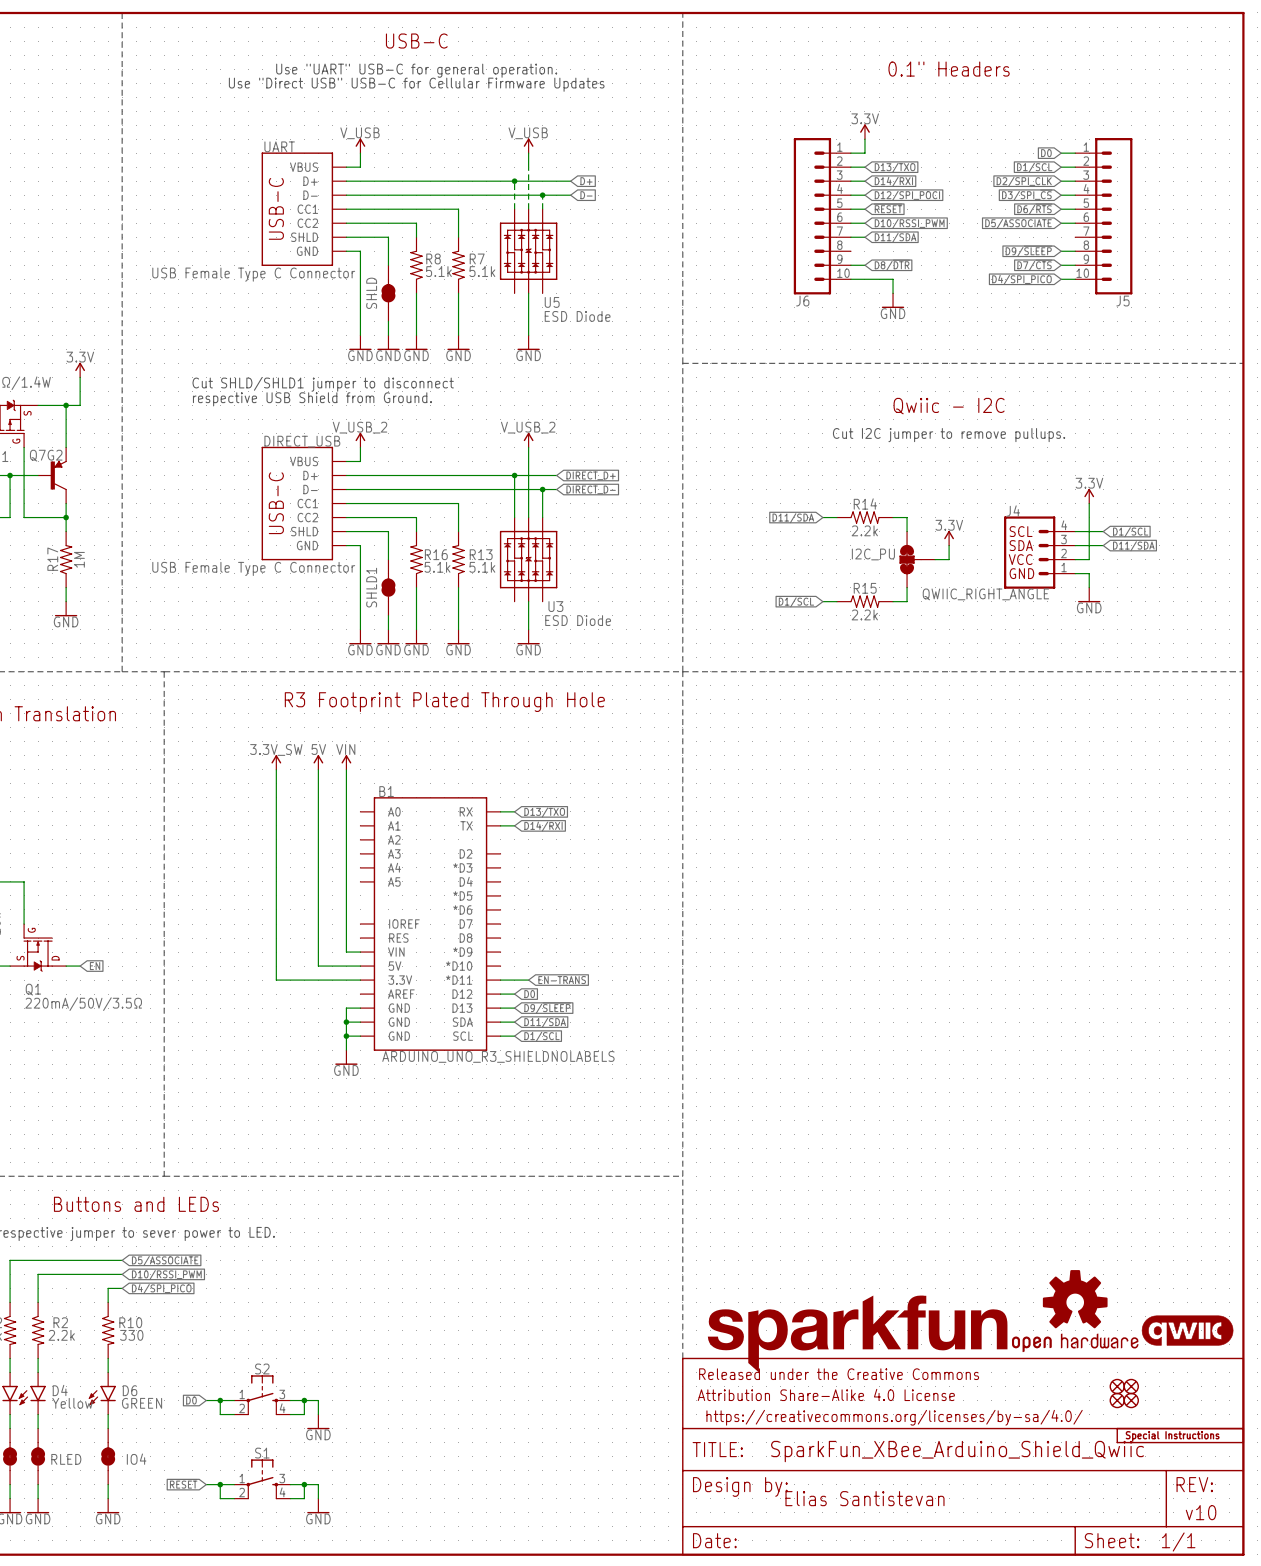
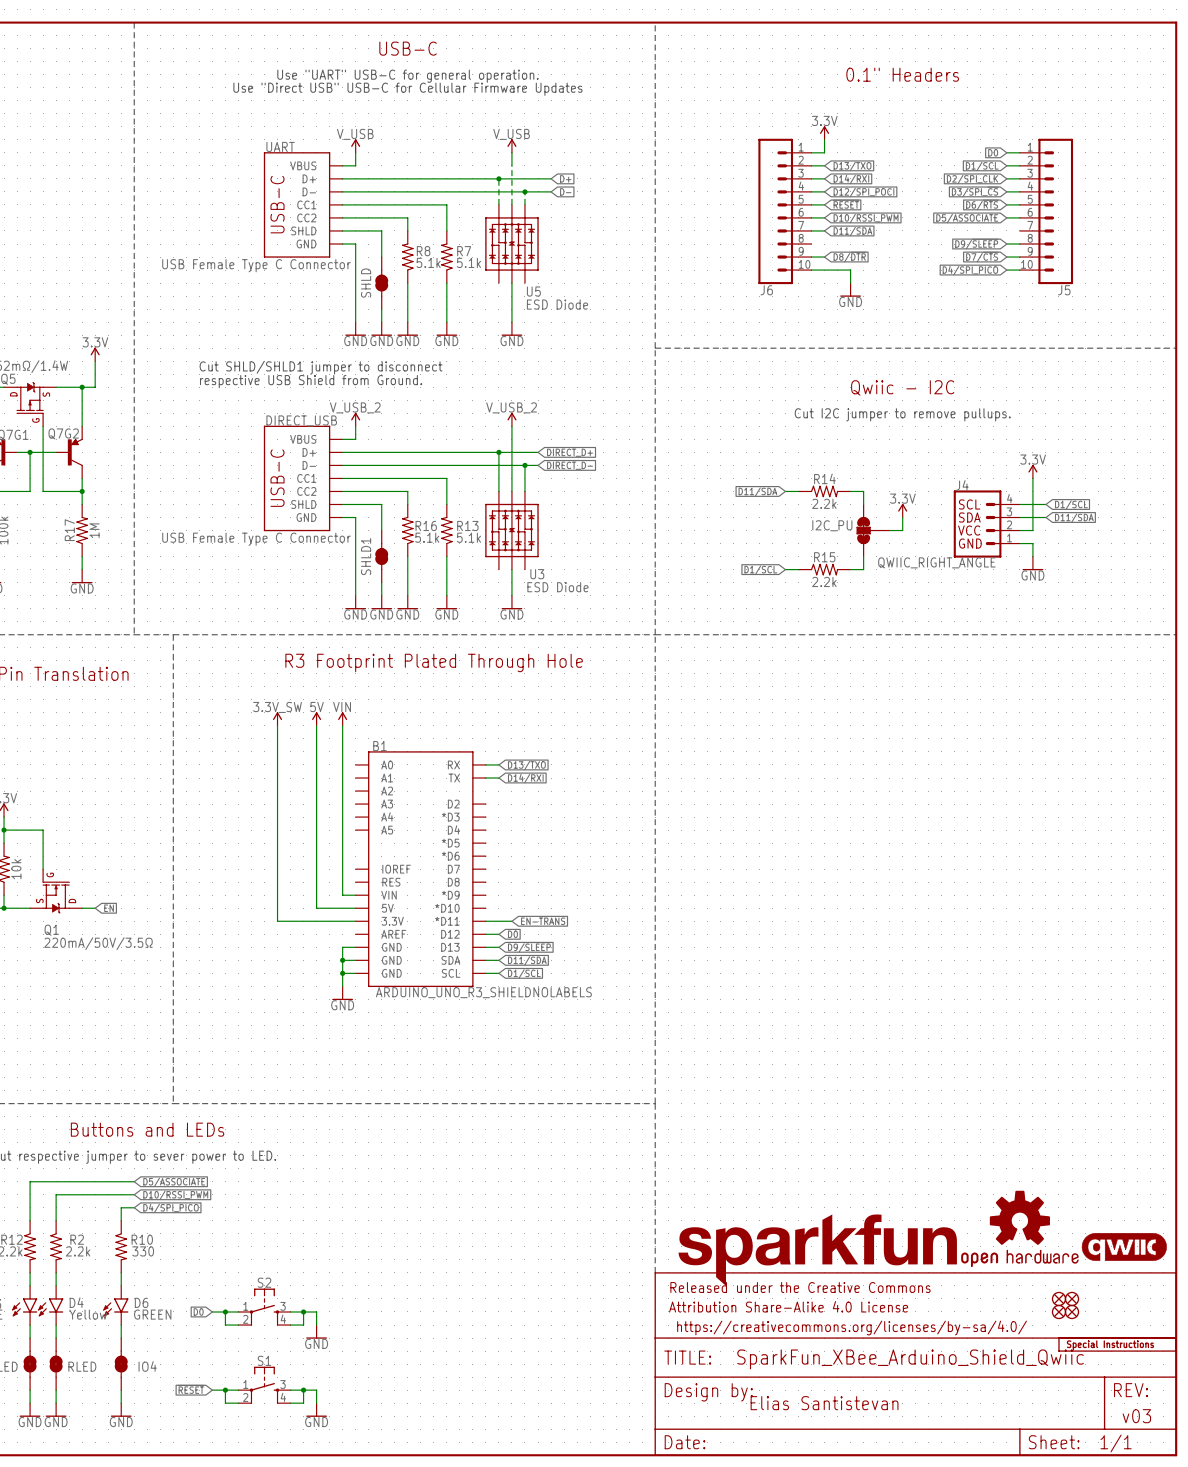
text: v10 (1201, 1512) -> v03 (1136, 1416)

